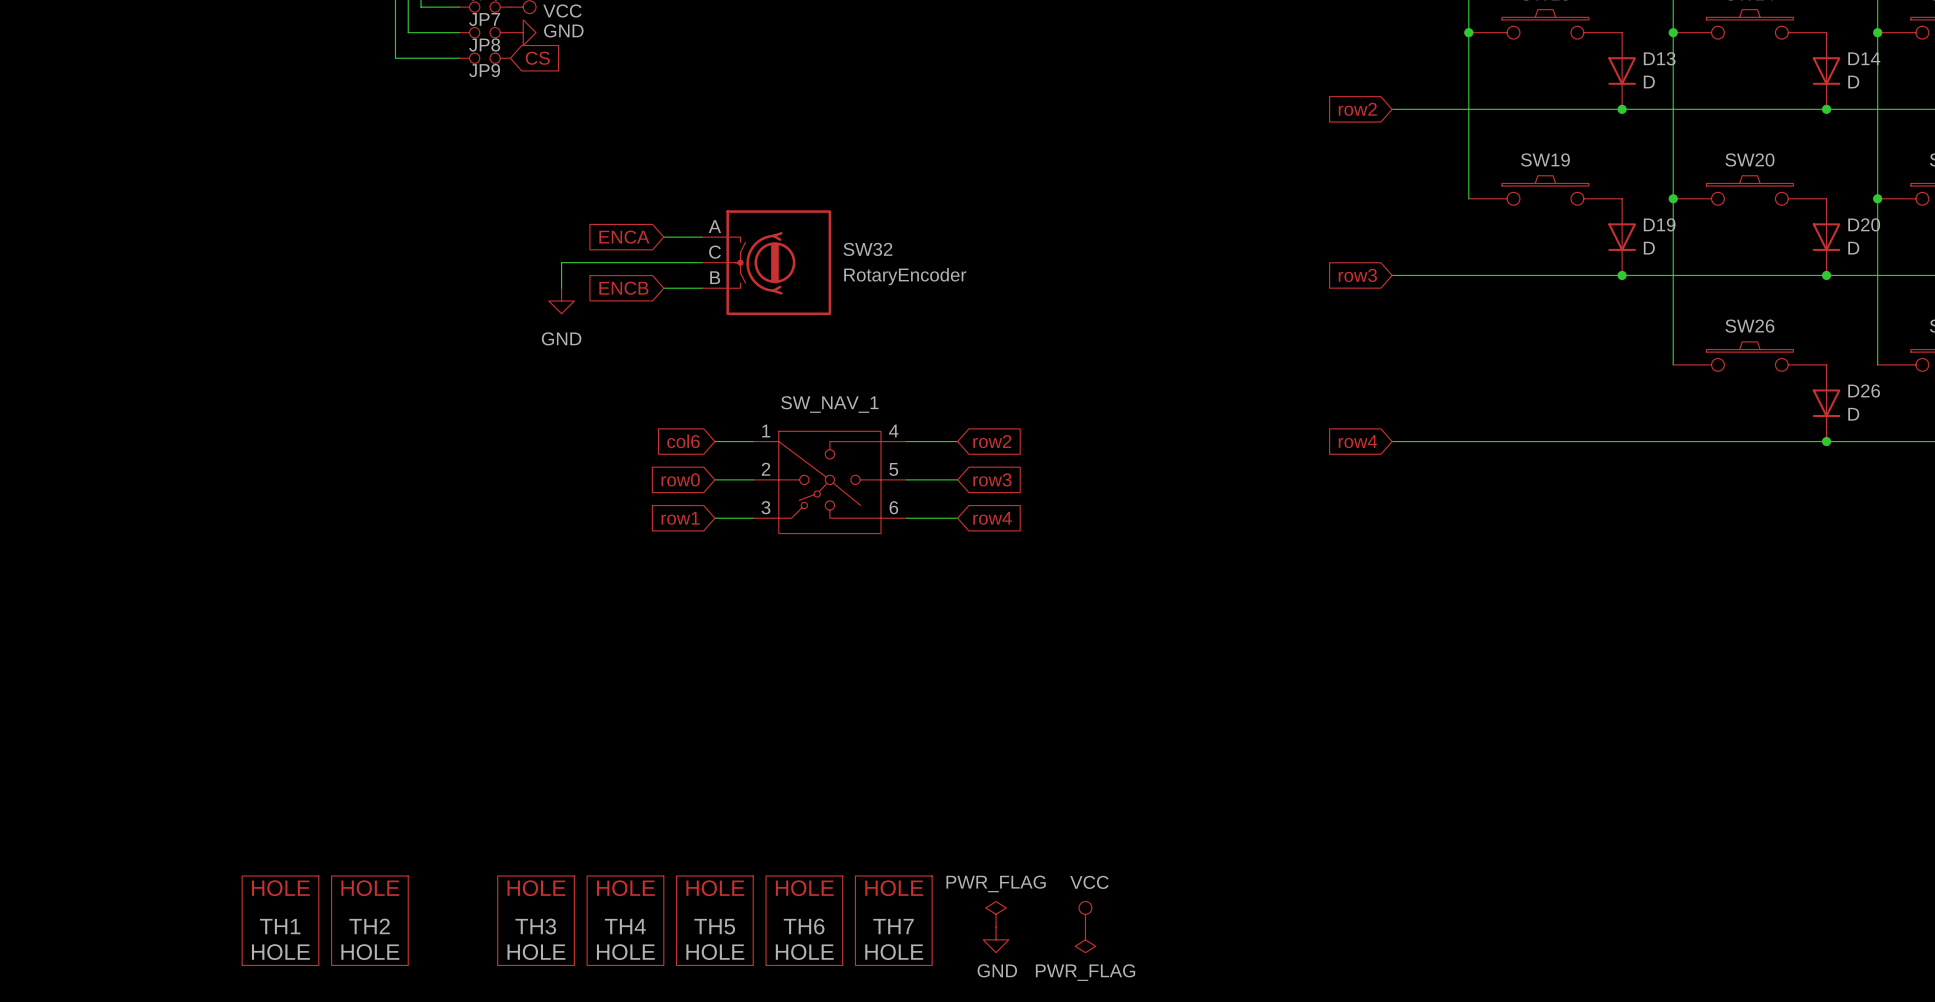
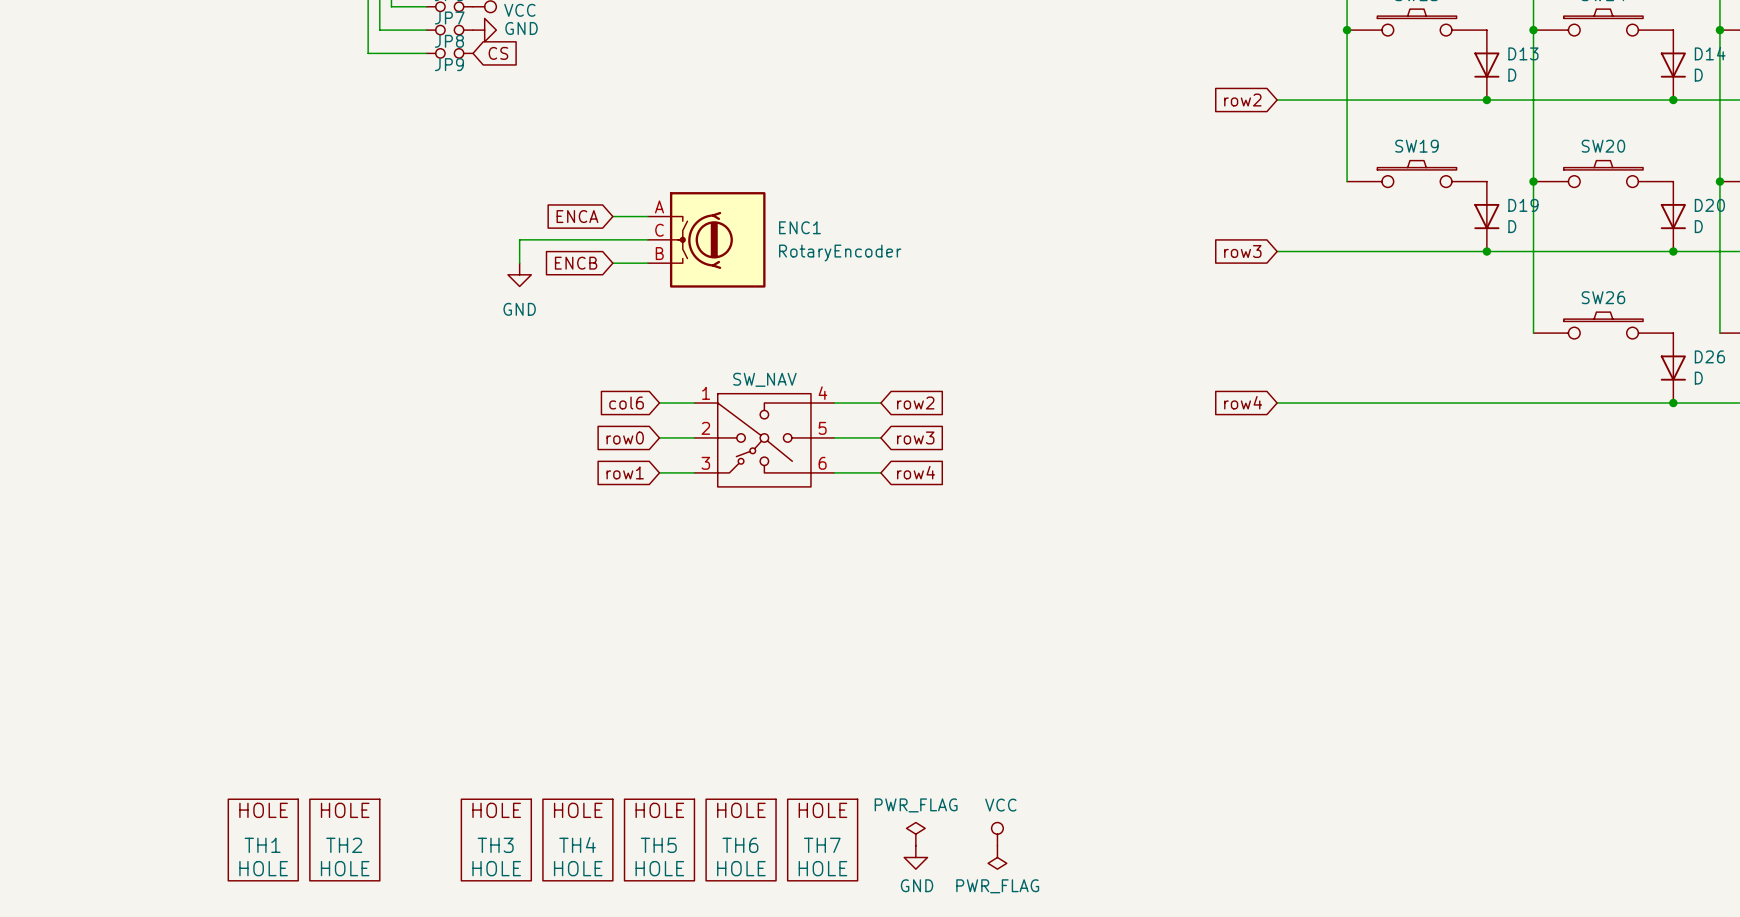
SW32 name: SW32 (867, 249) -> ENC1 (799, 227)
SW_NAV_1 name: SW_NAV_1 (829, 404) -> none
SW_NAV_1 value: none -> SW_NAV (764, 379)

